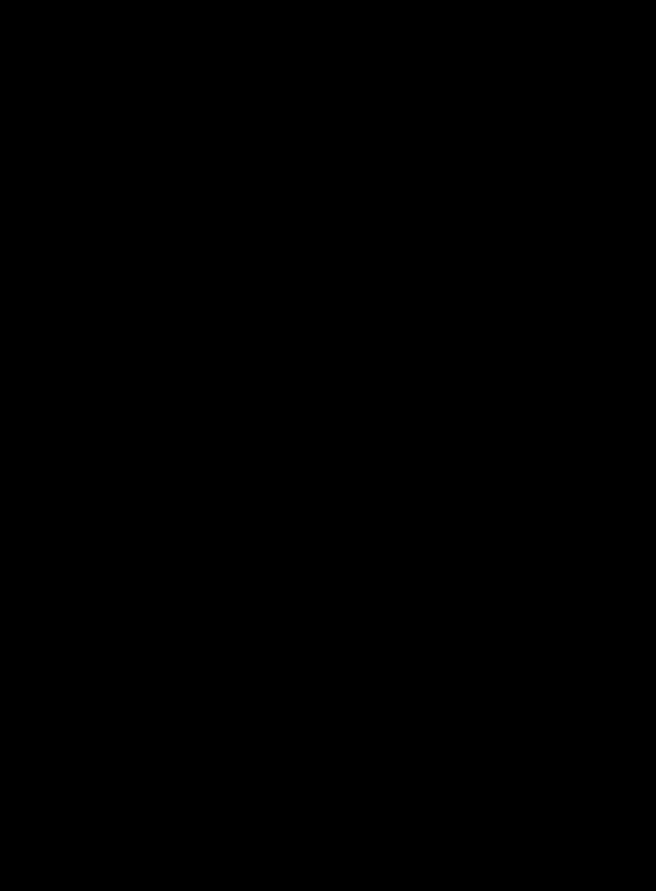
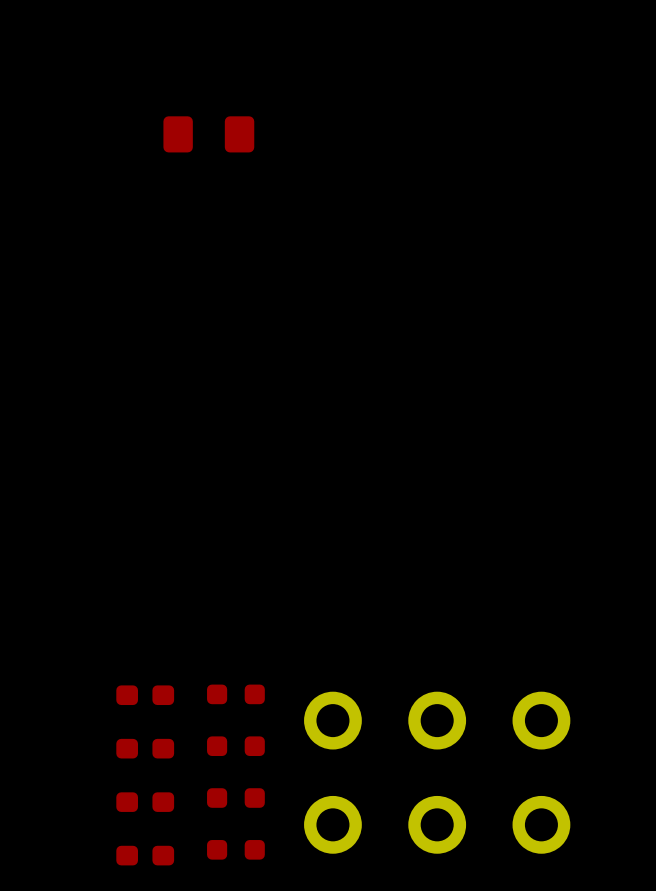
part: none -> (208, 134)
part: none -> (235, 694)
part: none -> (145, 695)
part: none -> (332, 720)
part: none -> (437, 720)
part: none -> (541, 720)
part: none -> (235, 746)
part: none -> (145, 748)
part: none -> (235, 798)
part: none -> (145, 802)
part: none -> (332, 824)
part: none -> (437, 824)
part: none -> (541, 824)
part: none -> (235, 849)
part: none -> (145, 855)

